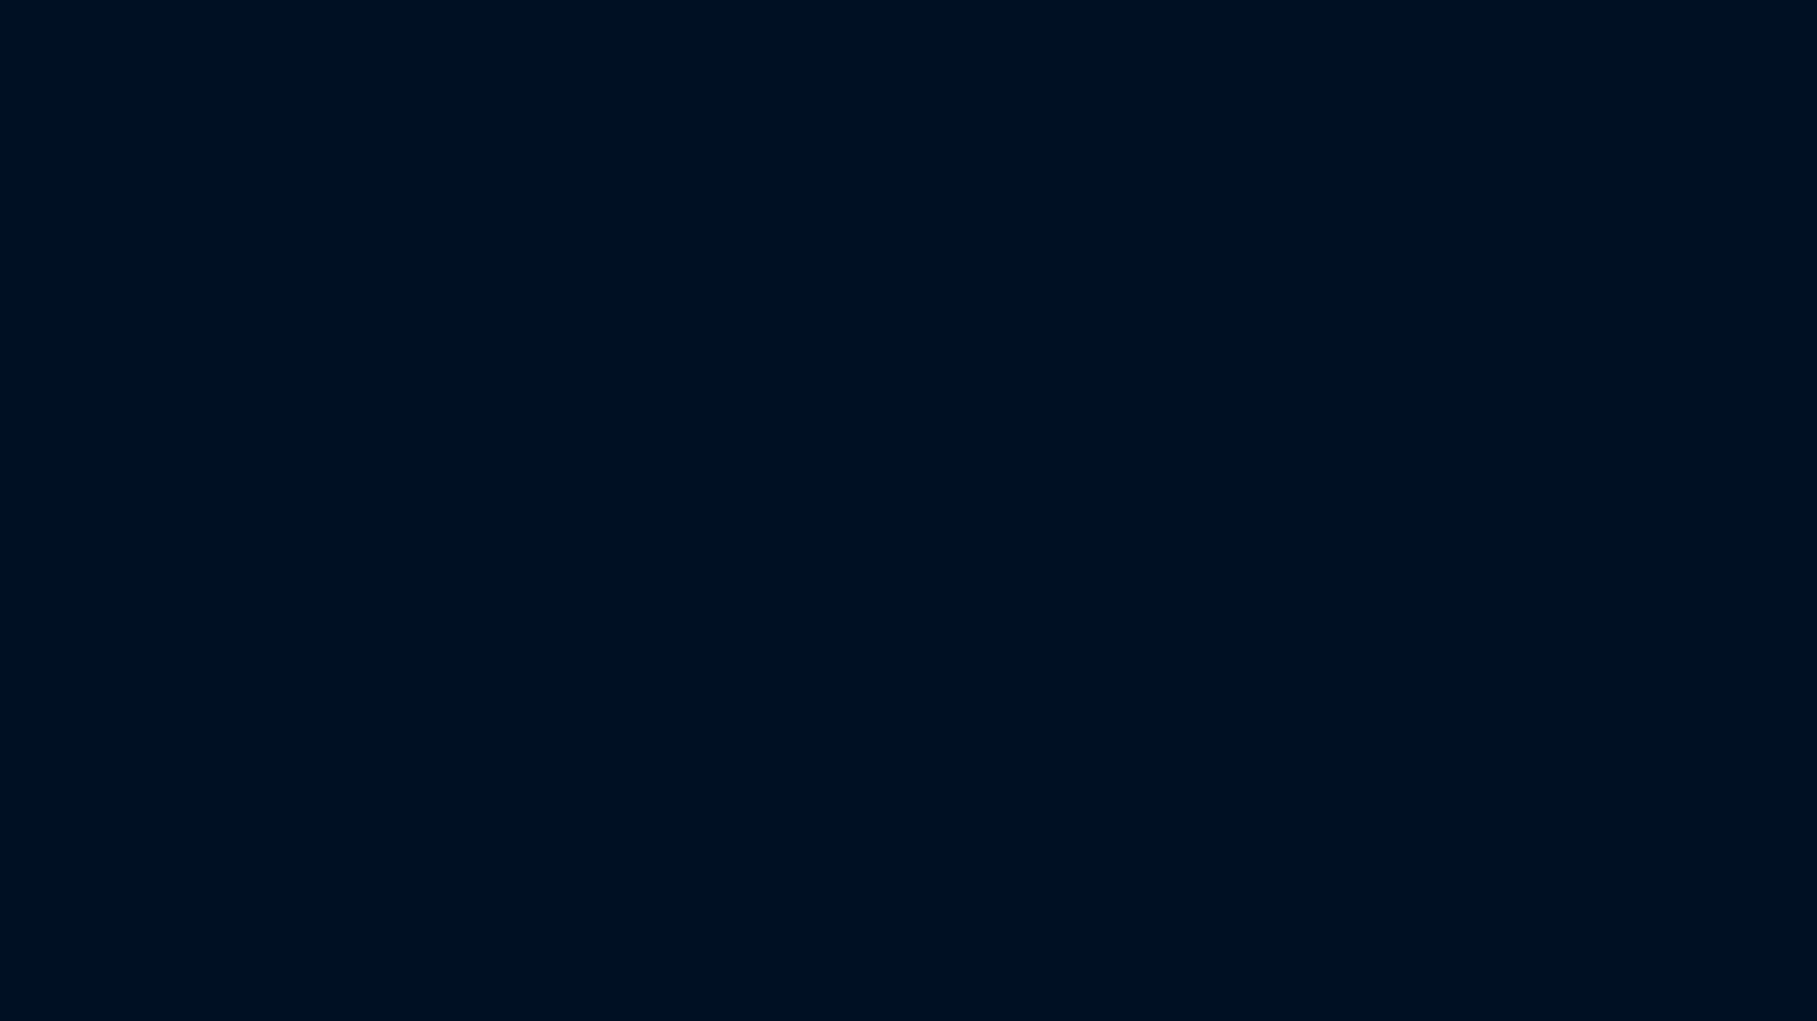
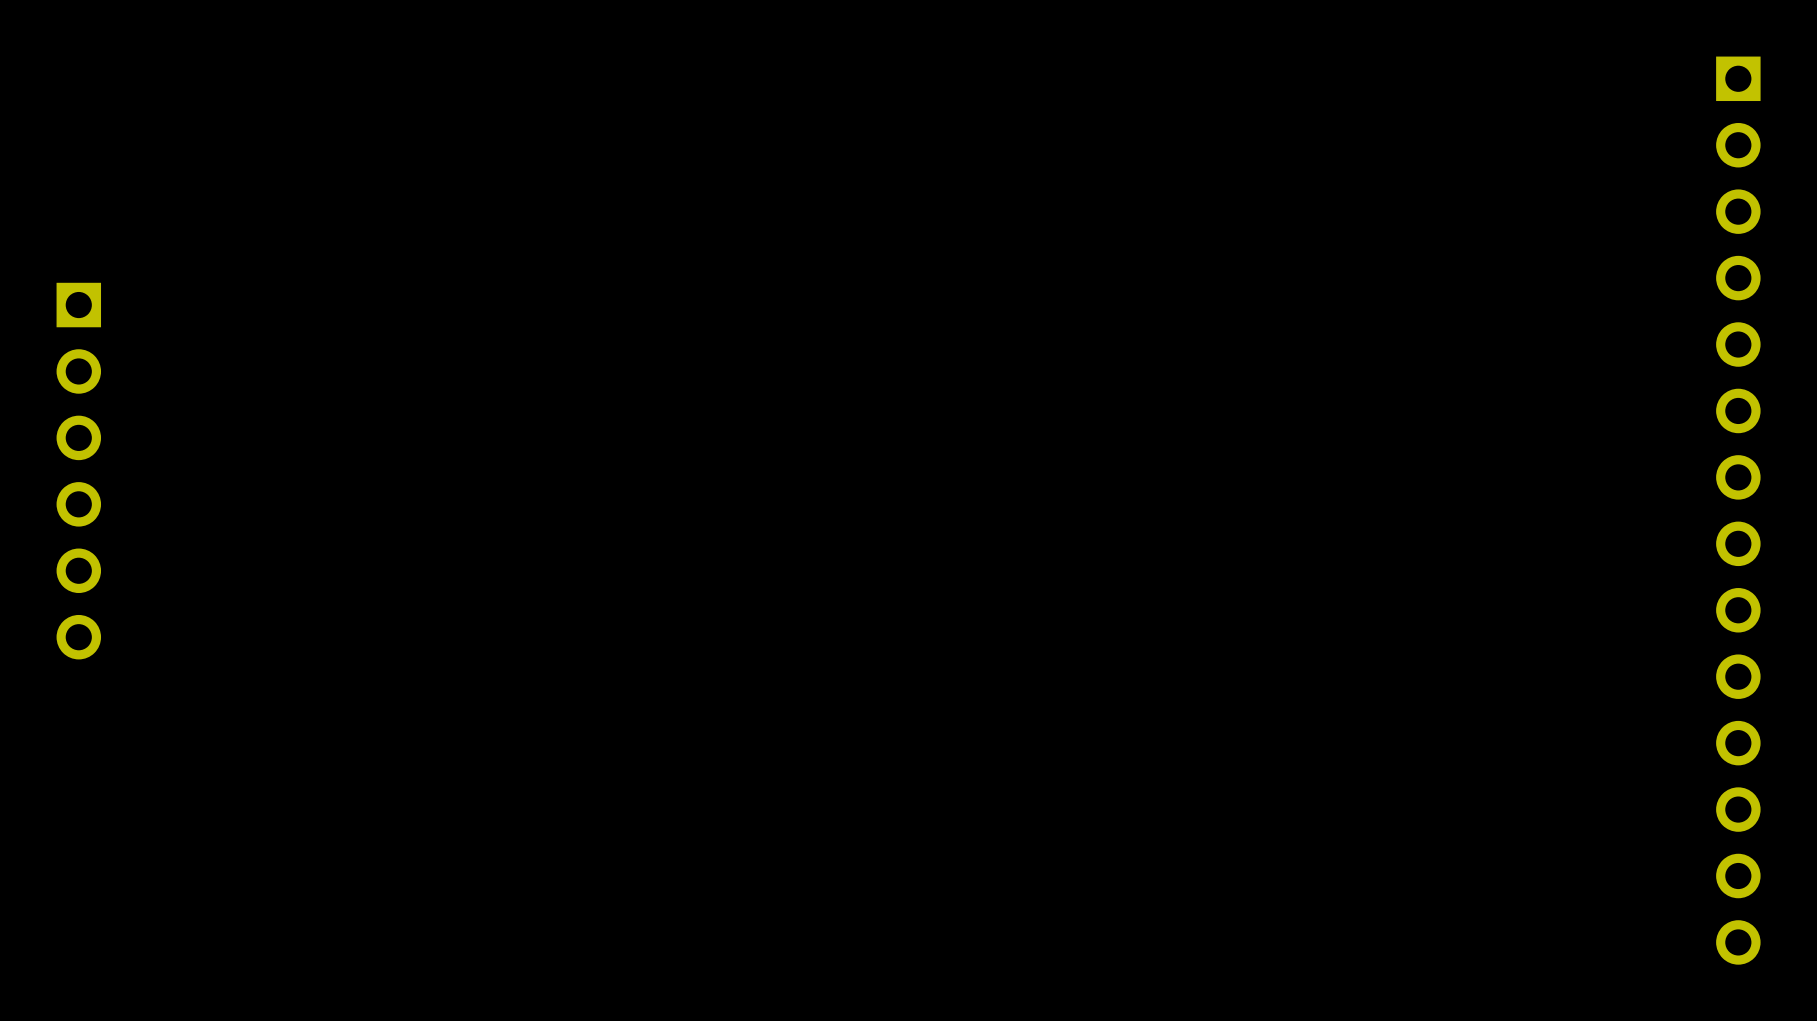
part: none -> (78, 471)
part: none -> (1738, 510)

